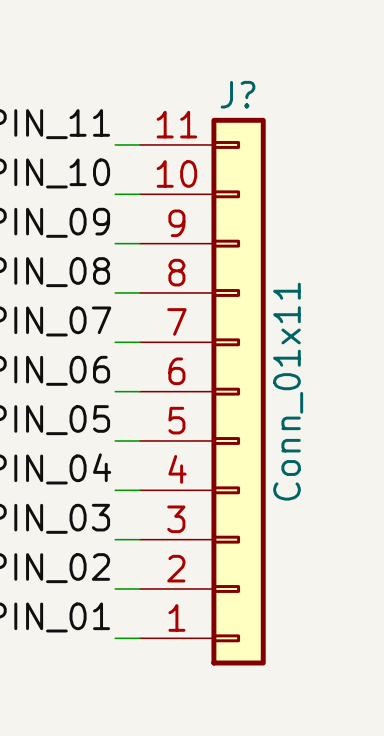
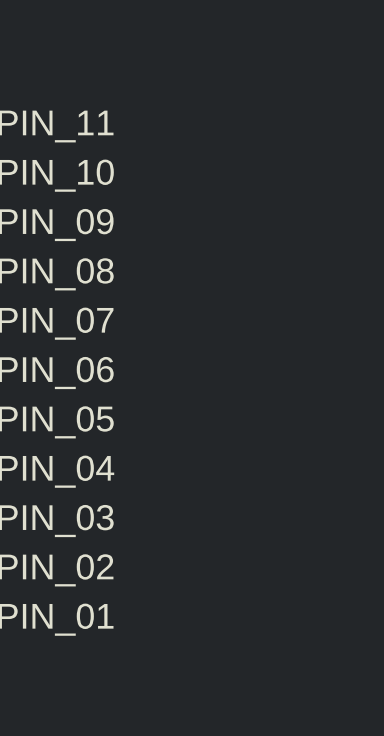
wire: (115, 144) (139, 144) -> none
wire: (115, 194) (139, 194) -> none
wire: (115, 243) (139, 243) -> none
wire: (115, 292) (139, 292) -> none
wire: (115, 342) (139, 342) -> none
wire: (115, 391) (139, 391) -> none
J?: Conn_01x11 (202, 391) -> none
wire: (115, 440) (139, 440) -> none
wire: (115, 490) (139, 490) -> none
wire: (115, 539) (139, 539) -> none
wire: (115, 588) (139, 588) -> none
wire: (115, 638) (139, 638) -> none

